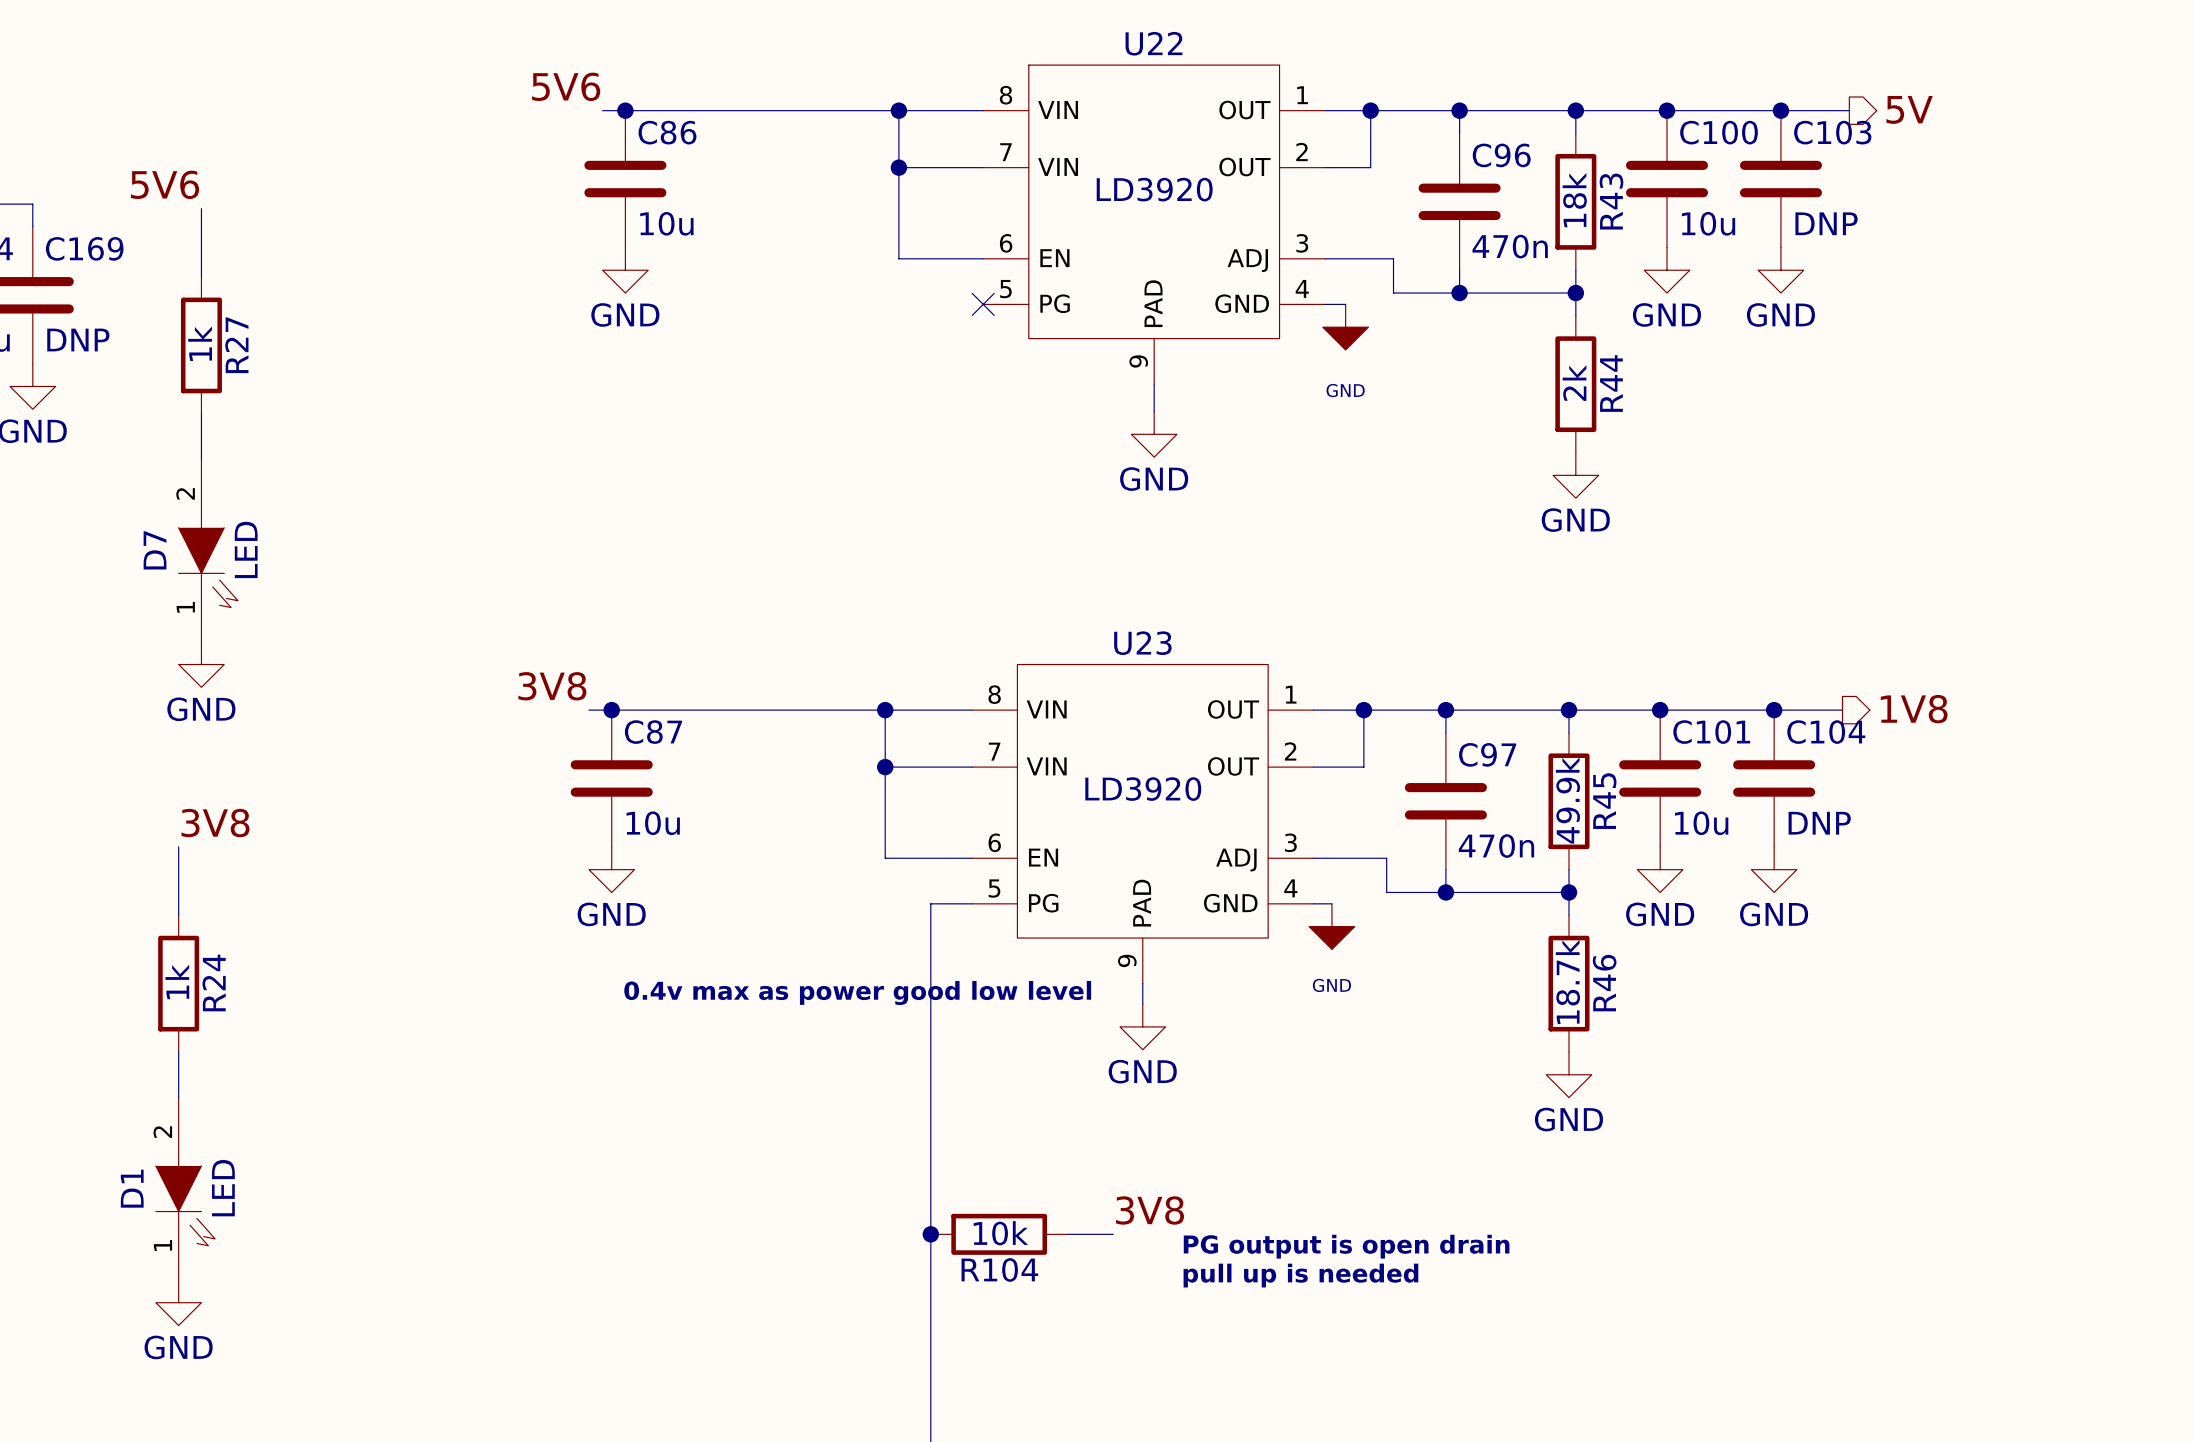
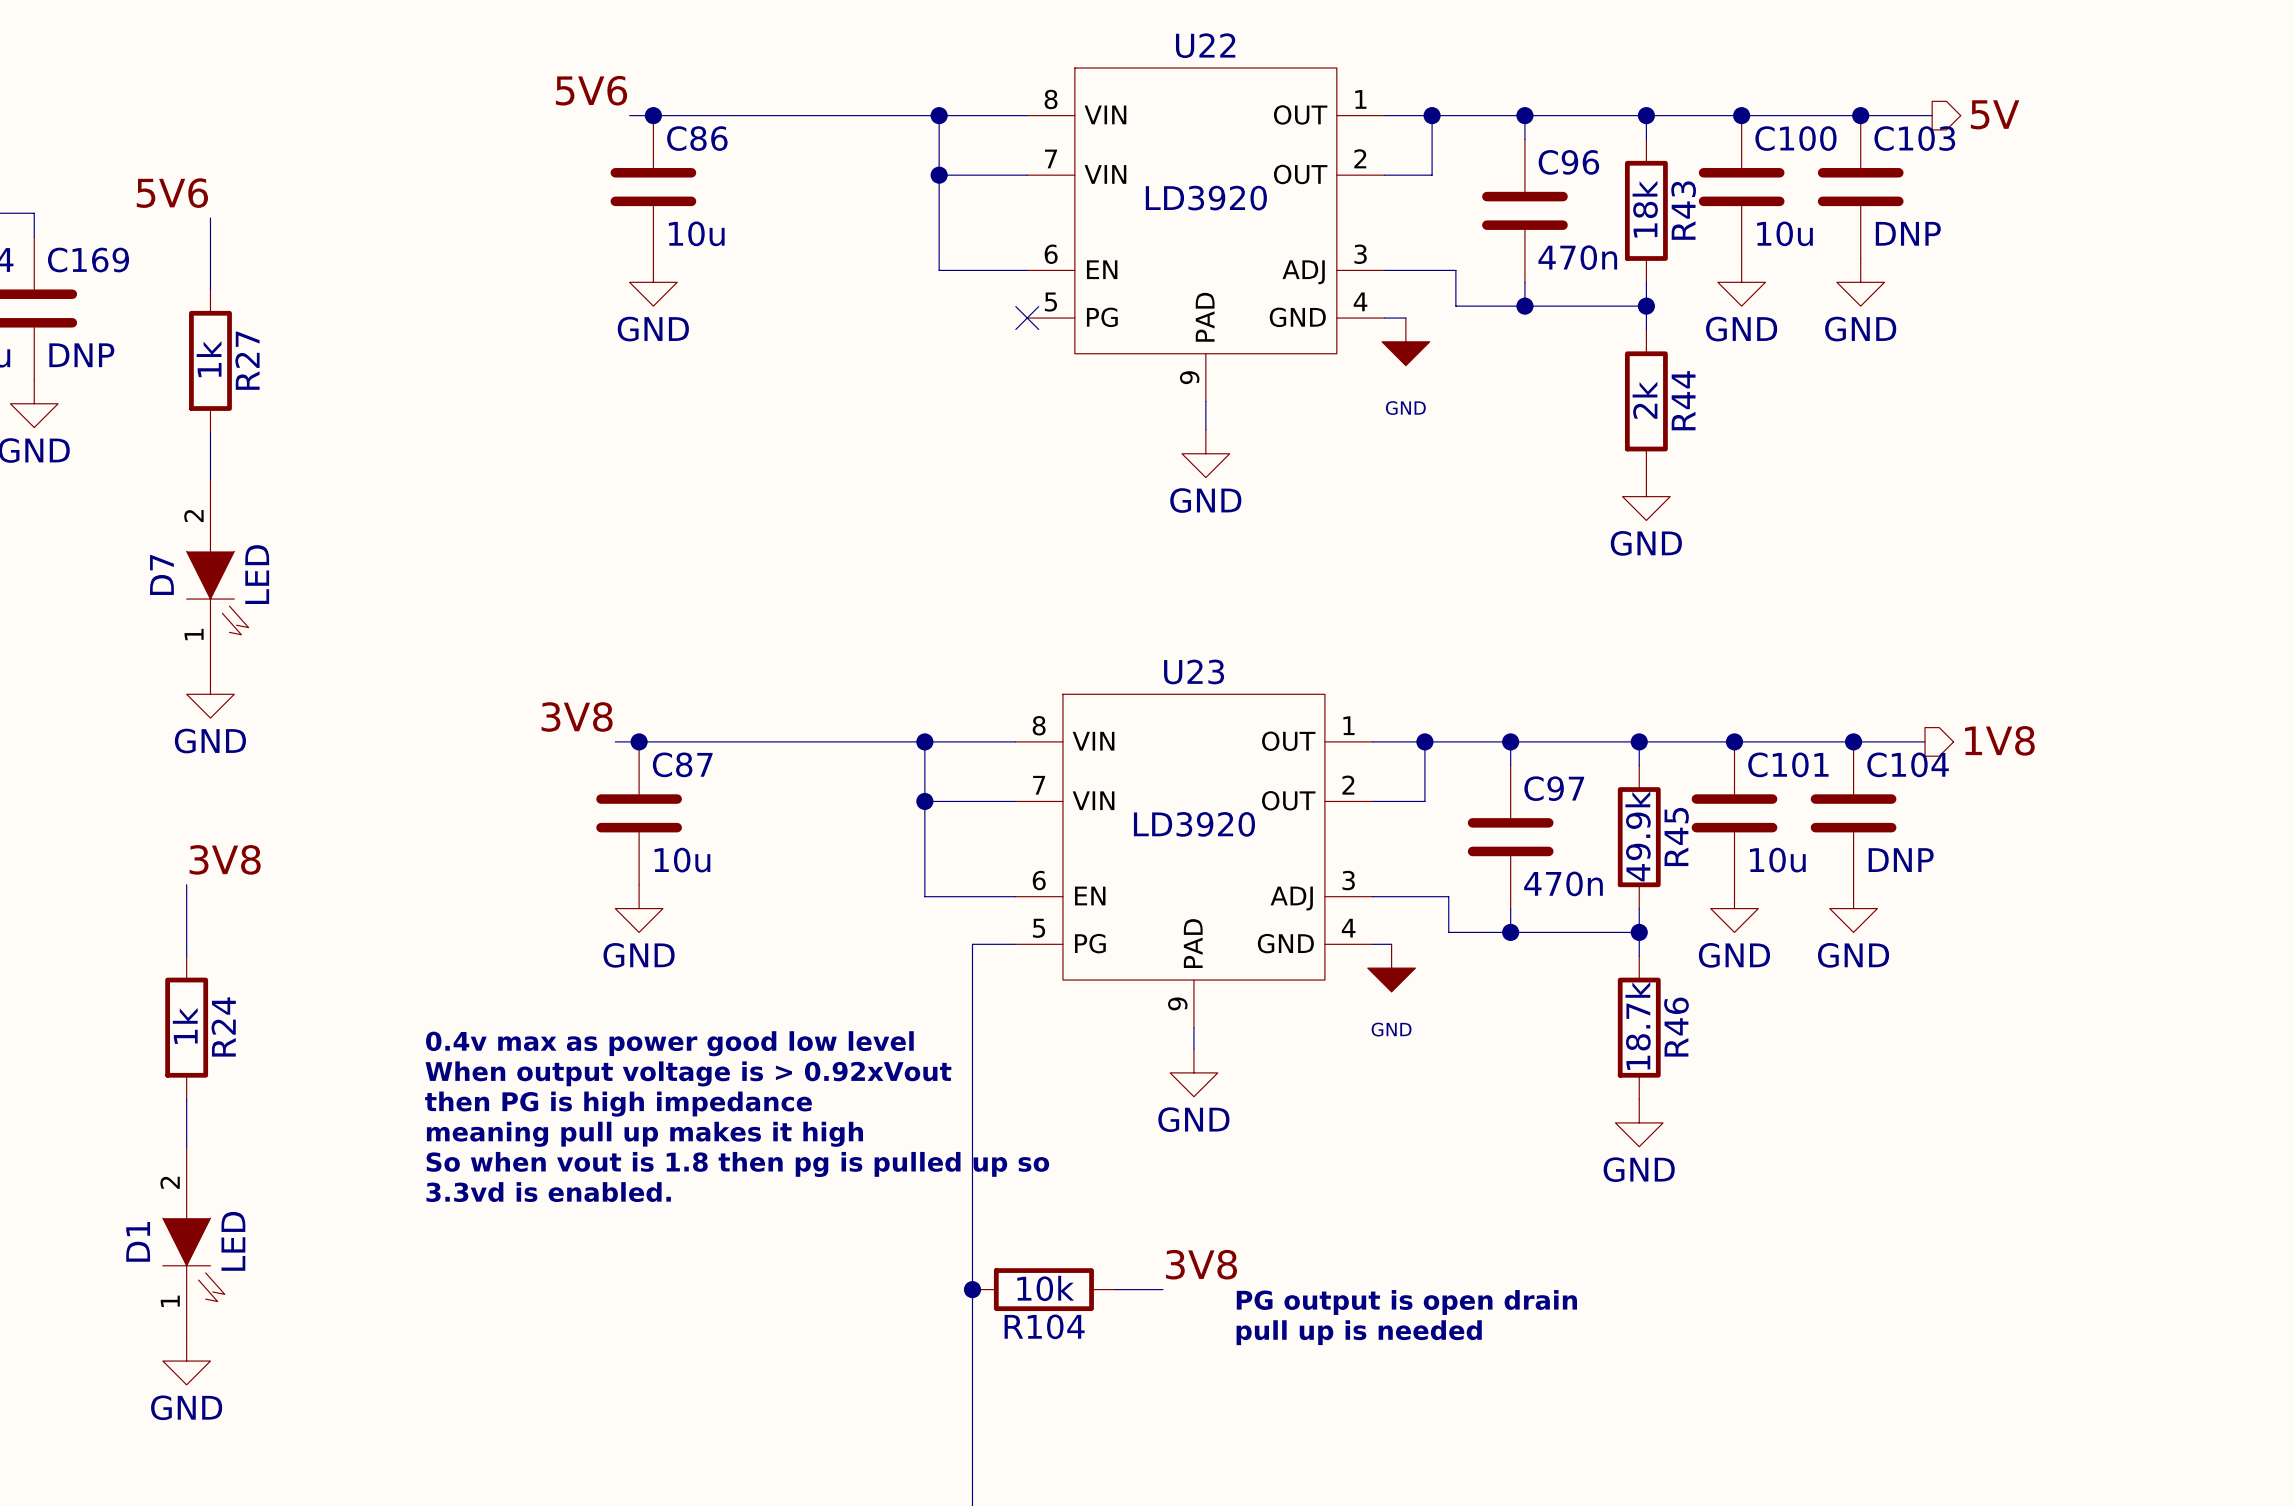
text position: 0.4v max as power good low level (857, 993) -> 0.4v max as power good low level (669, 1043)
text: none -> When output voltage is > 0.92xVout (688, 1073)
text: none -> then PG is high impedance (618, 1104)
text: none -> meaning pull up makes it high (644, 1134)
text: none -> So when vout is 1.8 then pg is pulled up so (737, 1164)
text: none -> 3.3vd is enabled. (548, 1192)

